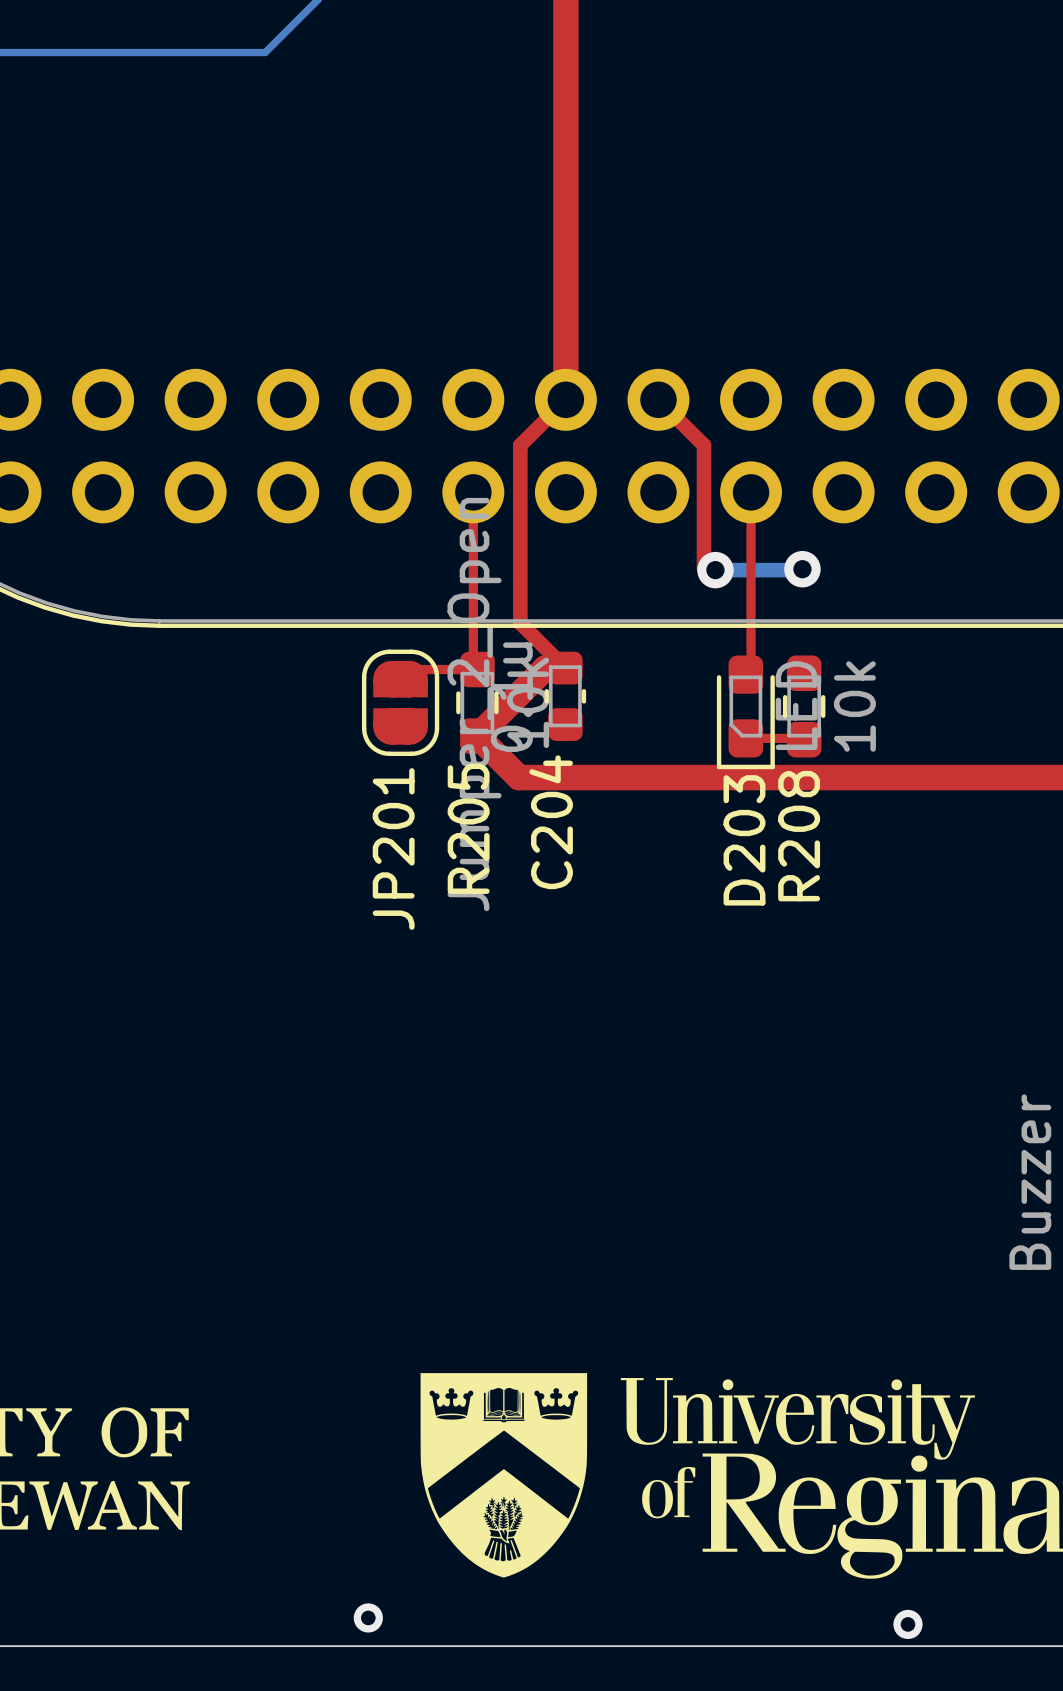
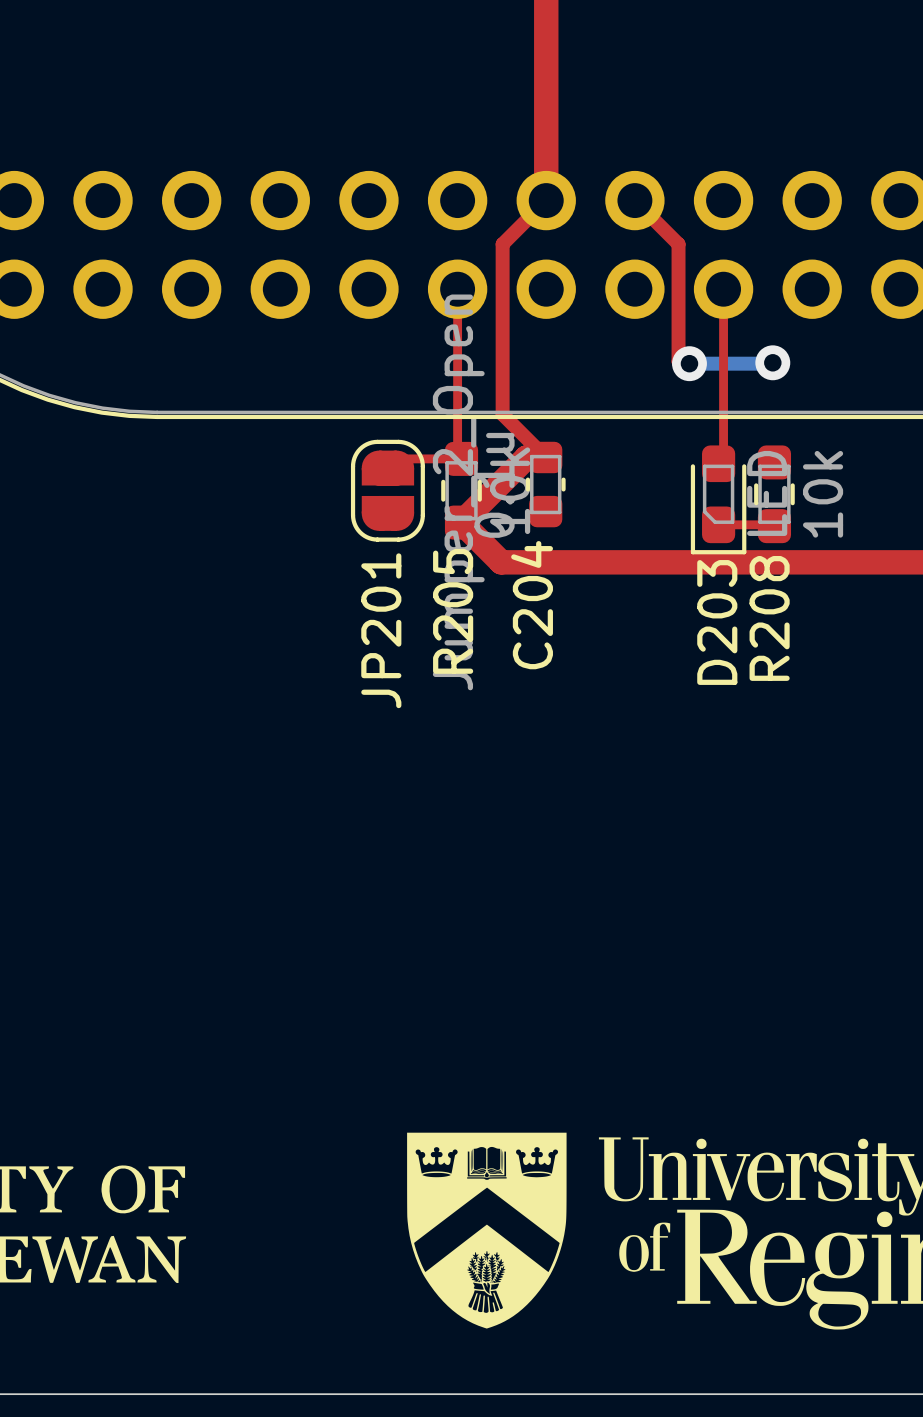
via: (368, 1617) -> none
via: (907, 1624) -> none

